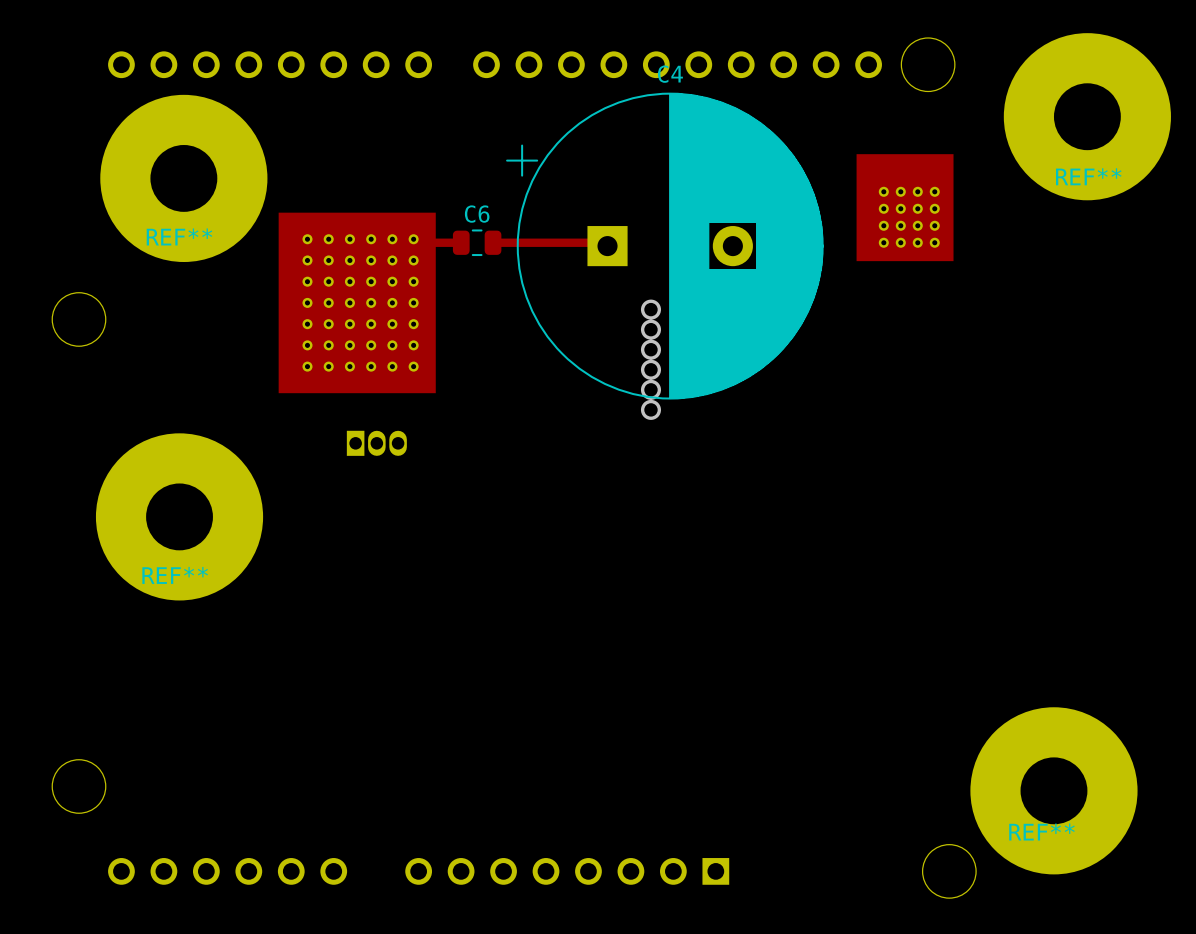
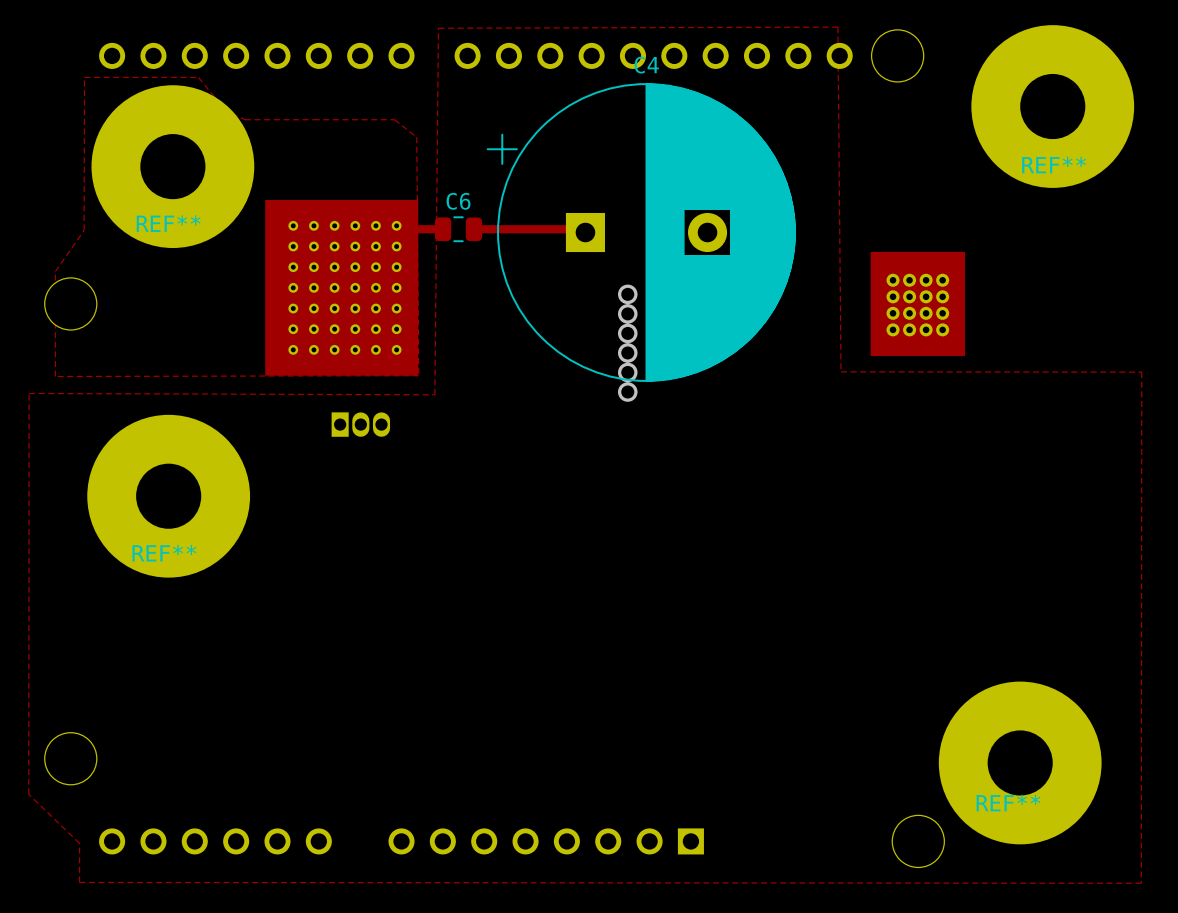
zone outline: none -> (837, 27) (438, 28) (434, 394) (29, 393) (28, 794) (79, 843) (79, 882) (1141, 883) (1141, 372) (840, 371) (837, 27)
zone outline: none -> (84, 77) (84, 230) (55, 271) (55, 376) (418, 375) (416, 137) (394, 119) (245, 119) (223, 109) (198, 77) (84, 77)
part: (905, 207) -> none
part: none -> (917, 303)

